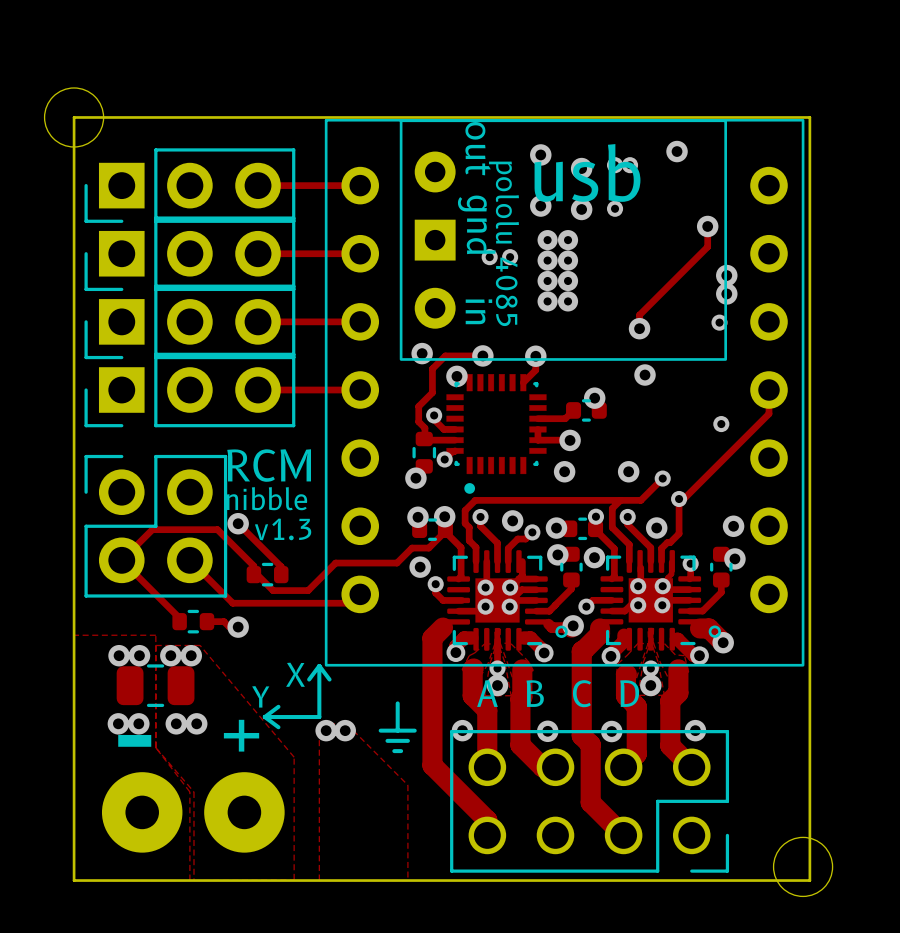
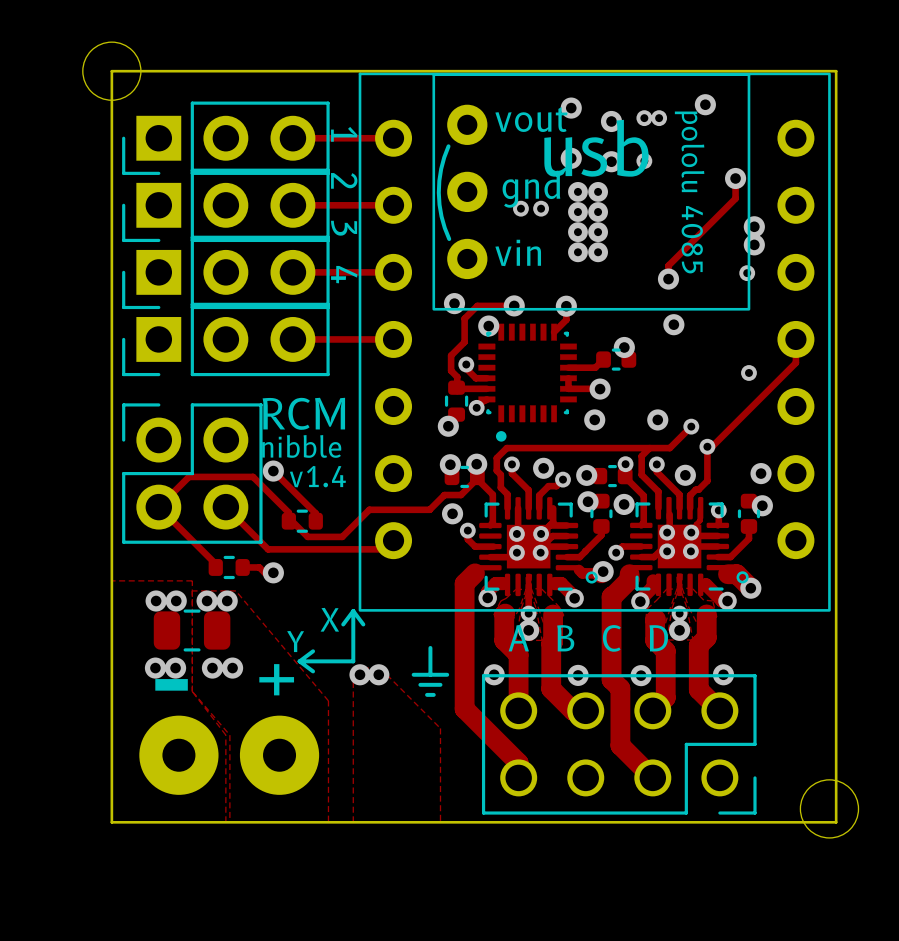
part footprint: [399, 119, 728, 361] -> [432, 73, 751, 311]
part text position: usb (587, 172) -> usb (596, 148)
line: none -> (448, 146) (441, 169) (438, 192) (441, 216) (449, 239)
part value: pololu 4085 (504, 243) -> none
text: none -> 1 2 3 4 (344, 205)
text: v1.3 (283, 529) -> v1.4 (317, 476)

